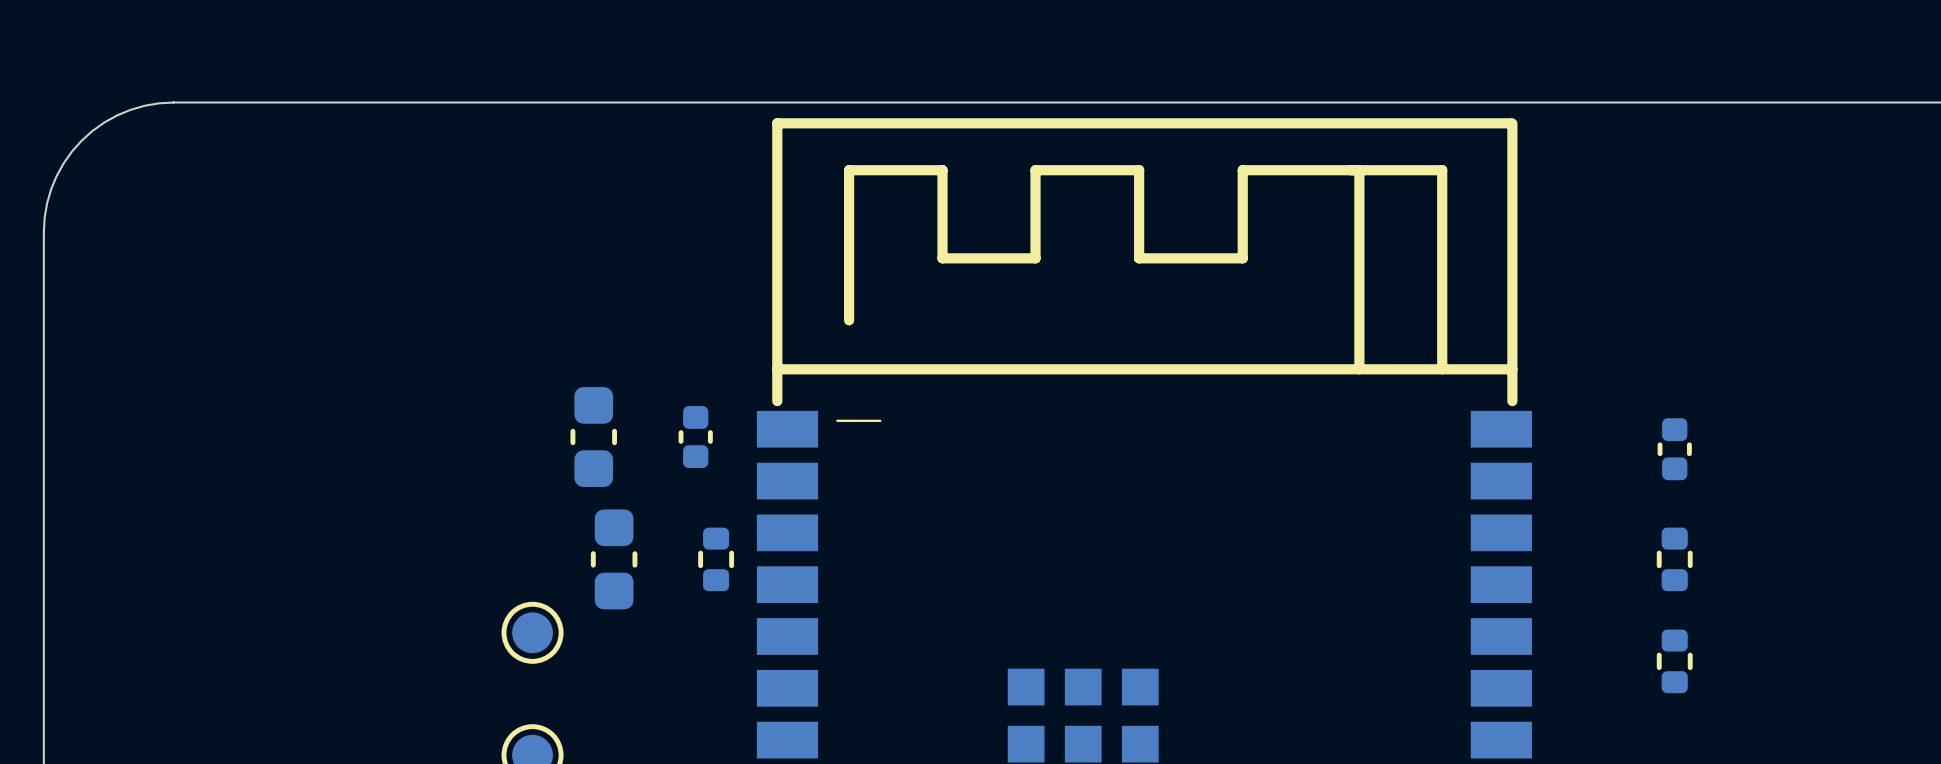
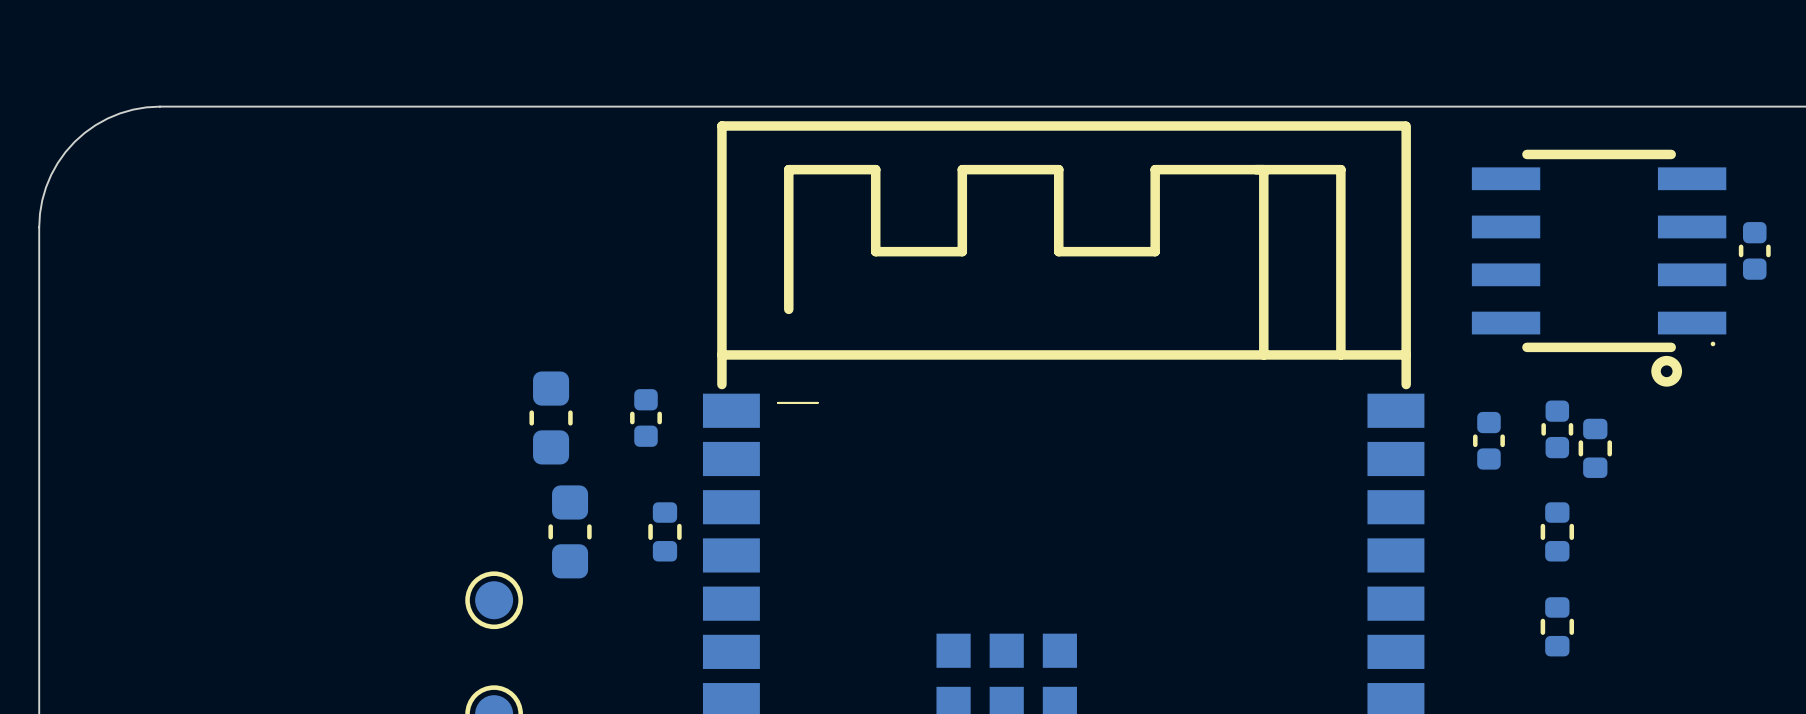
part: none -> (1754, 250)
part: none -> (1599, 268)
part: none -> (1488, 440)
part: none -> (1595, 448)

